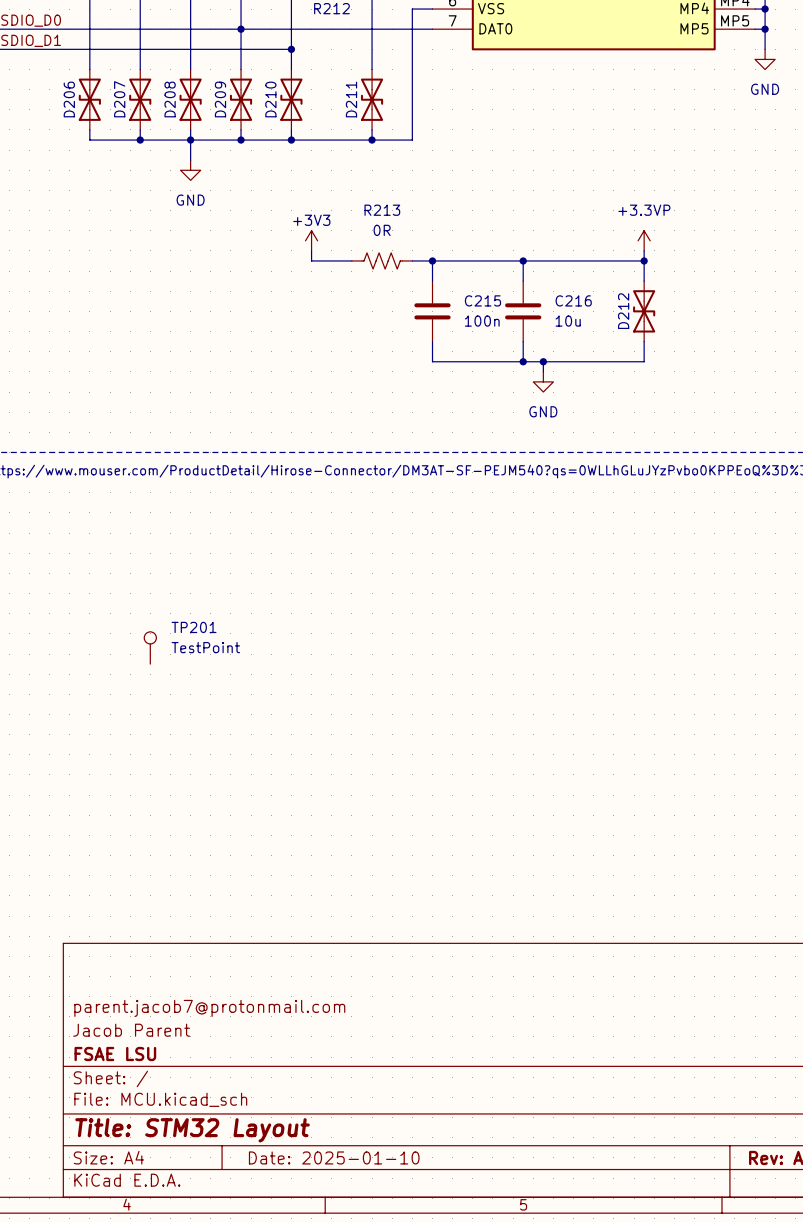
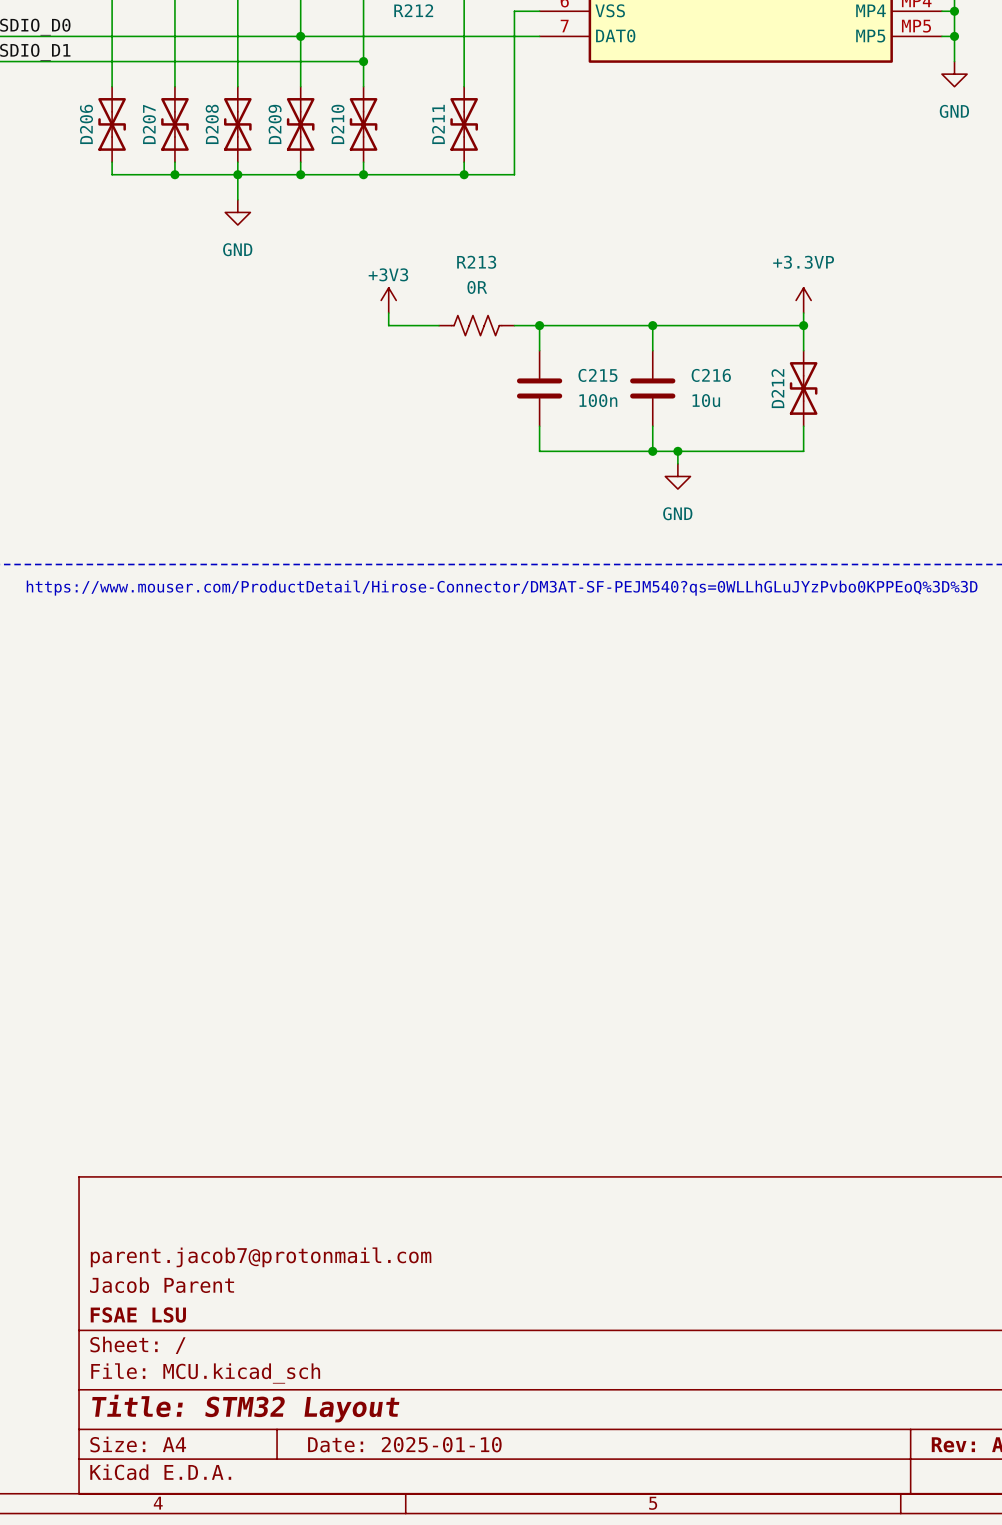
TP201: TestPoint (150, 647) -> none

